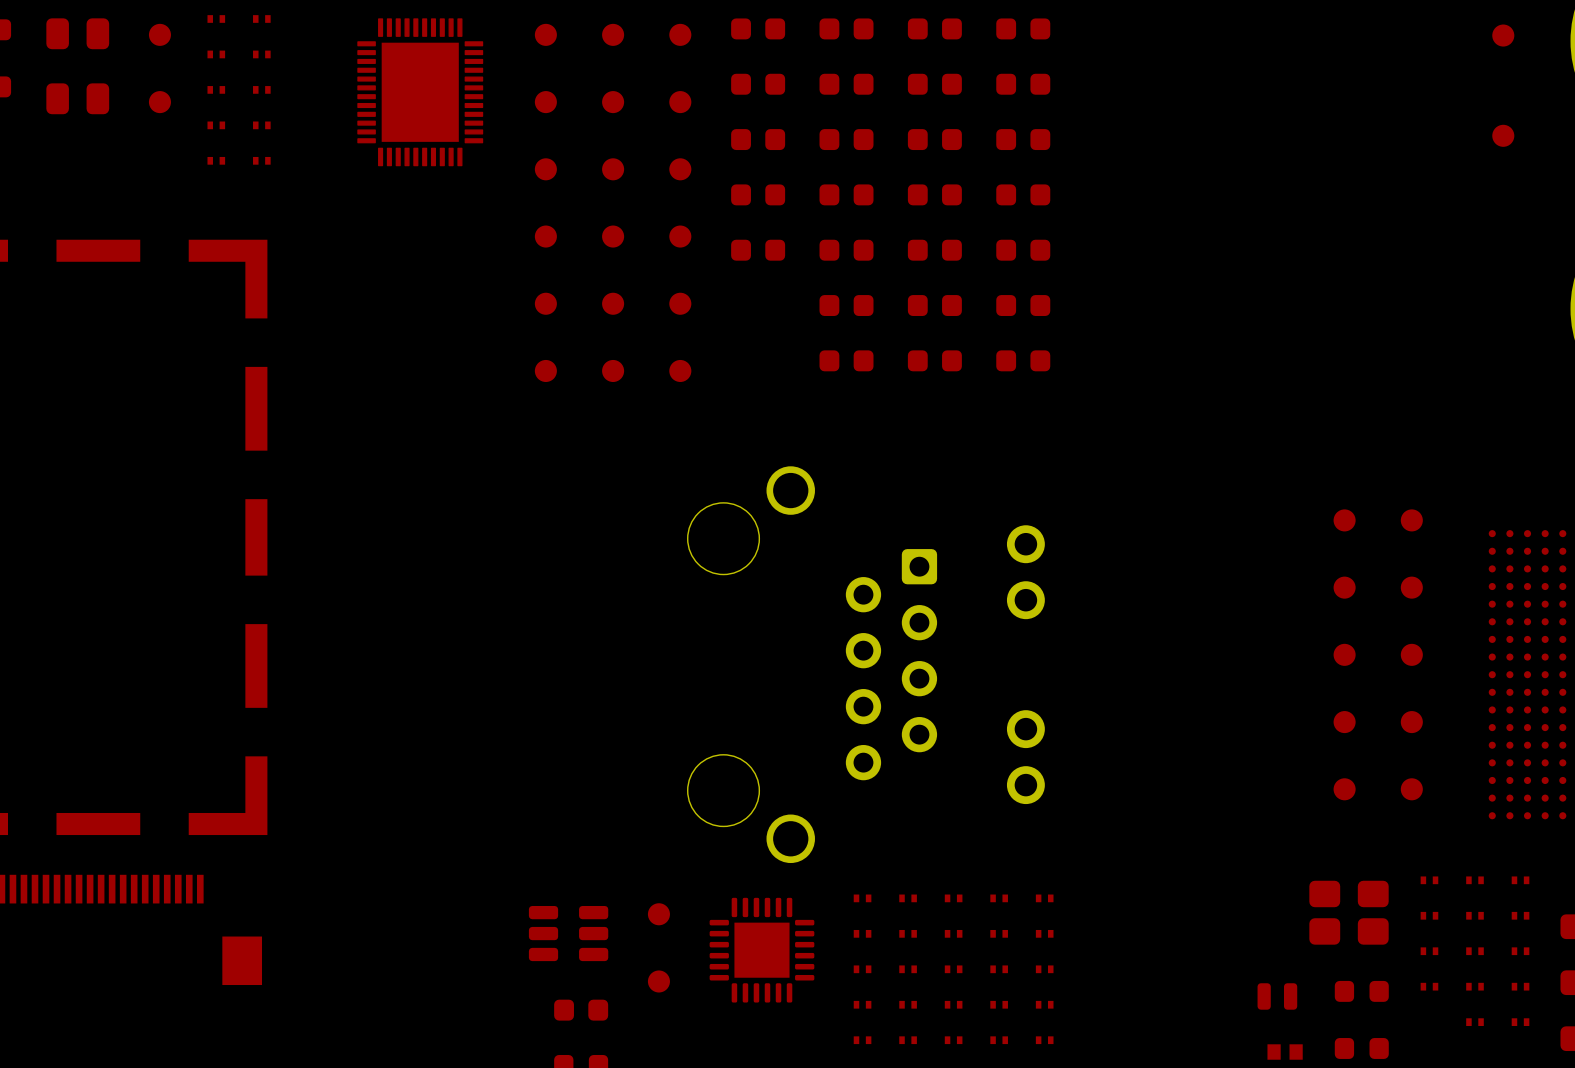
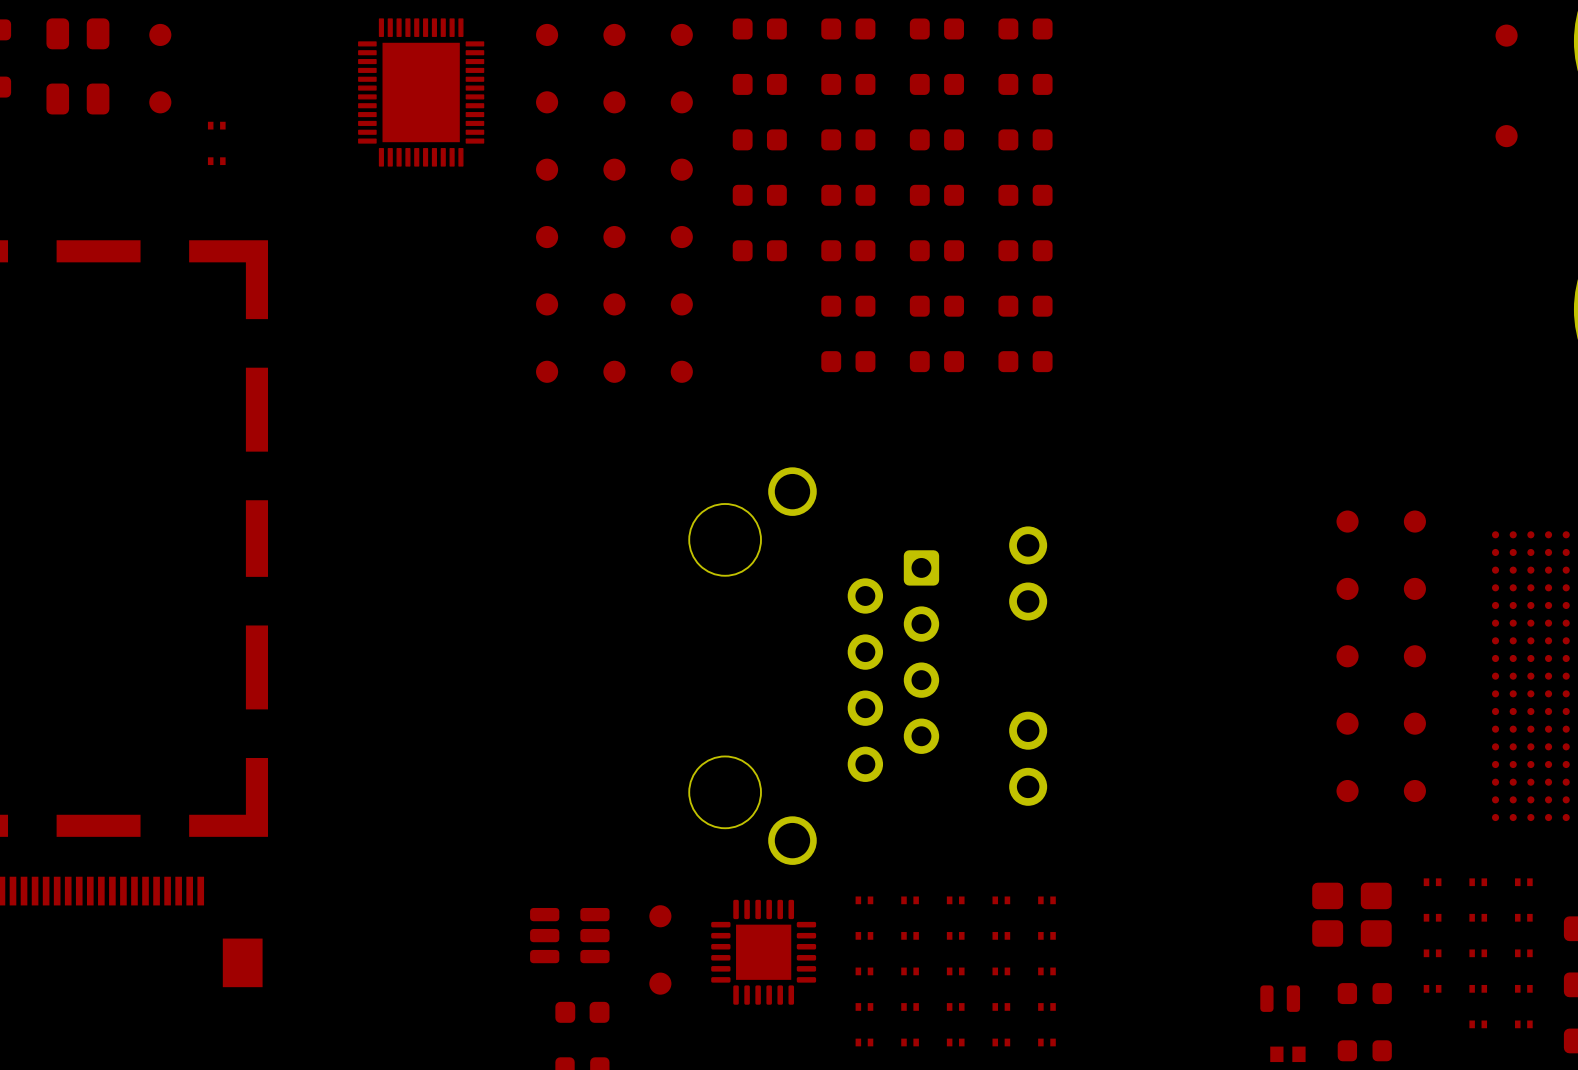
part: (216, 18) -> none
part: (261, 18) -> none
part: (216, 54) -> none
part: (261, 54) -> none
part: (216, 89) -> none
part: (261, 89) -> none
part: (261, 125) -> none
part: (261, 160) -> none

